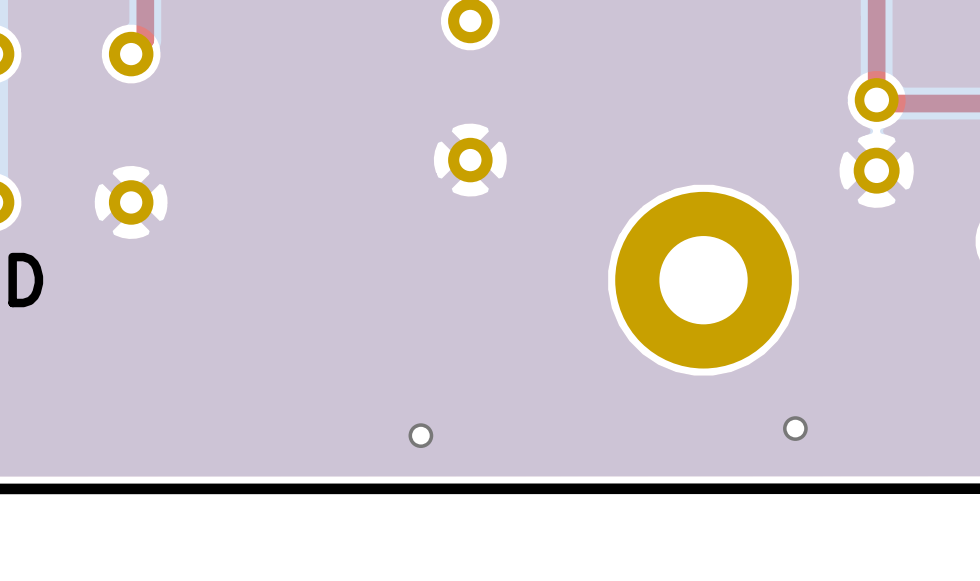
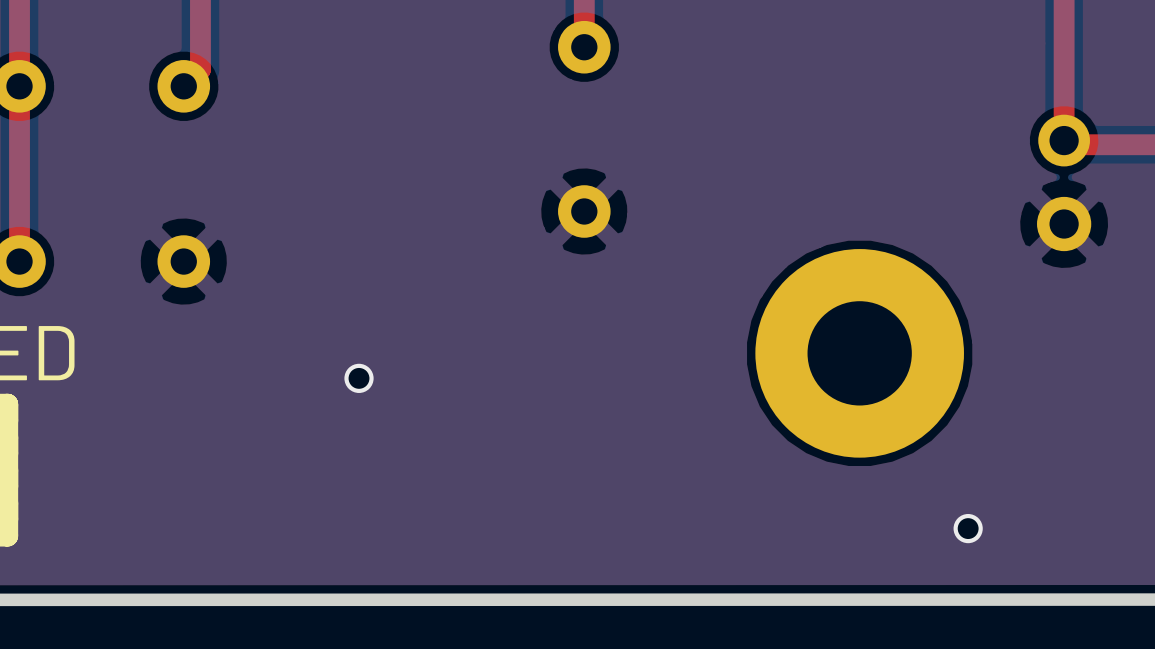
via: none -> (359, 378)
via: (420, 435) -> none

